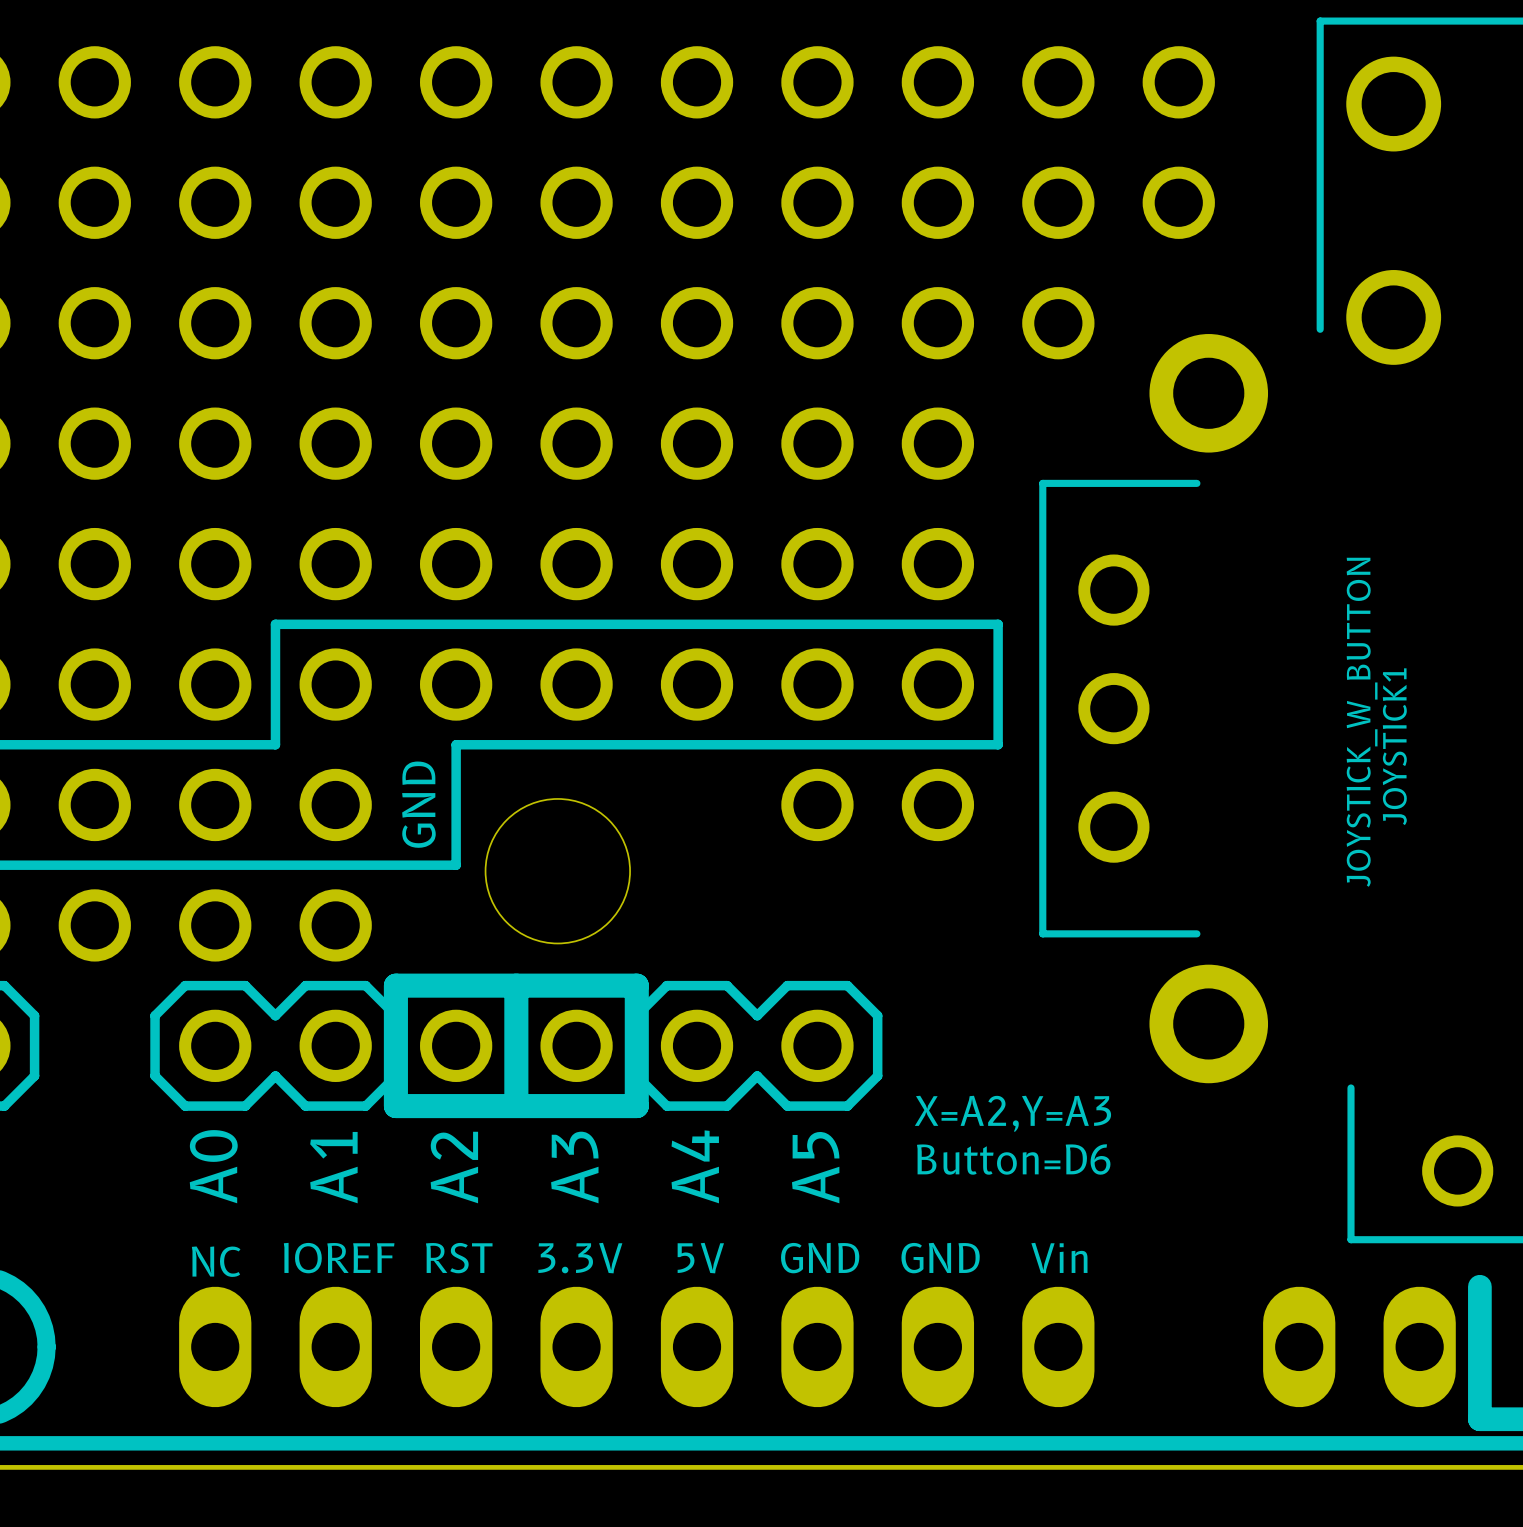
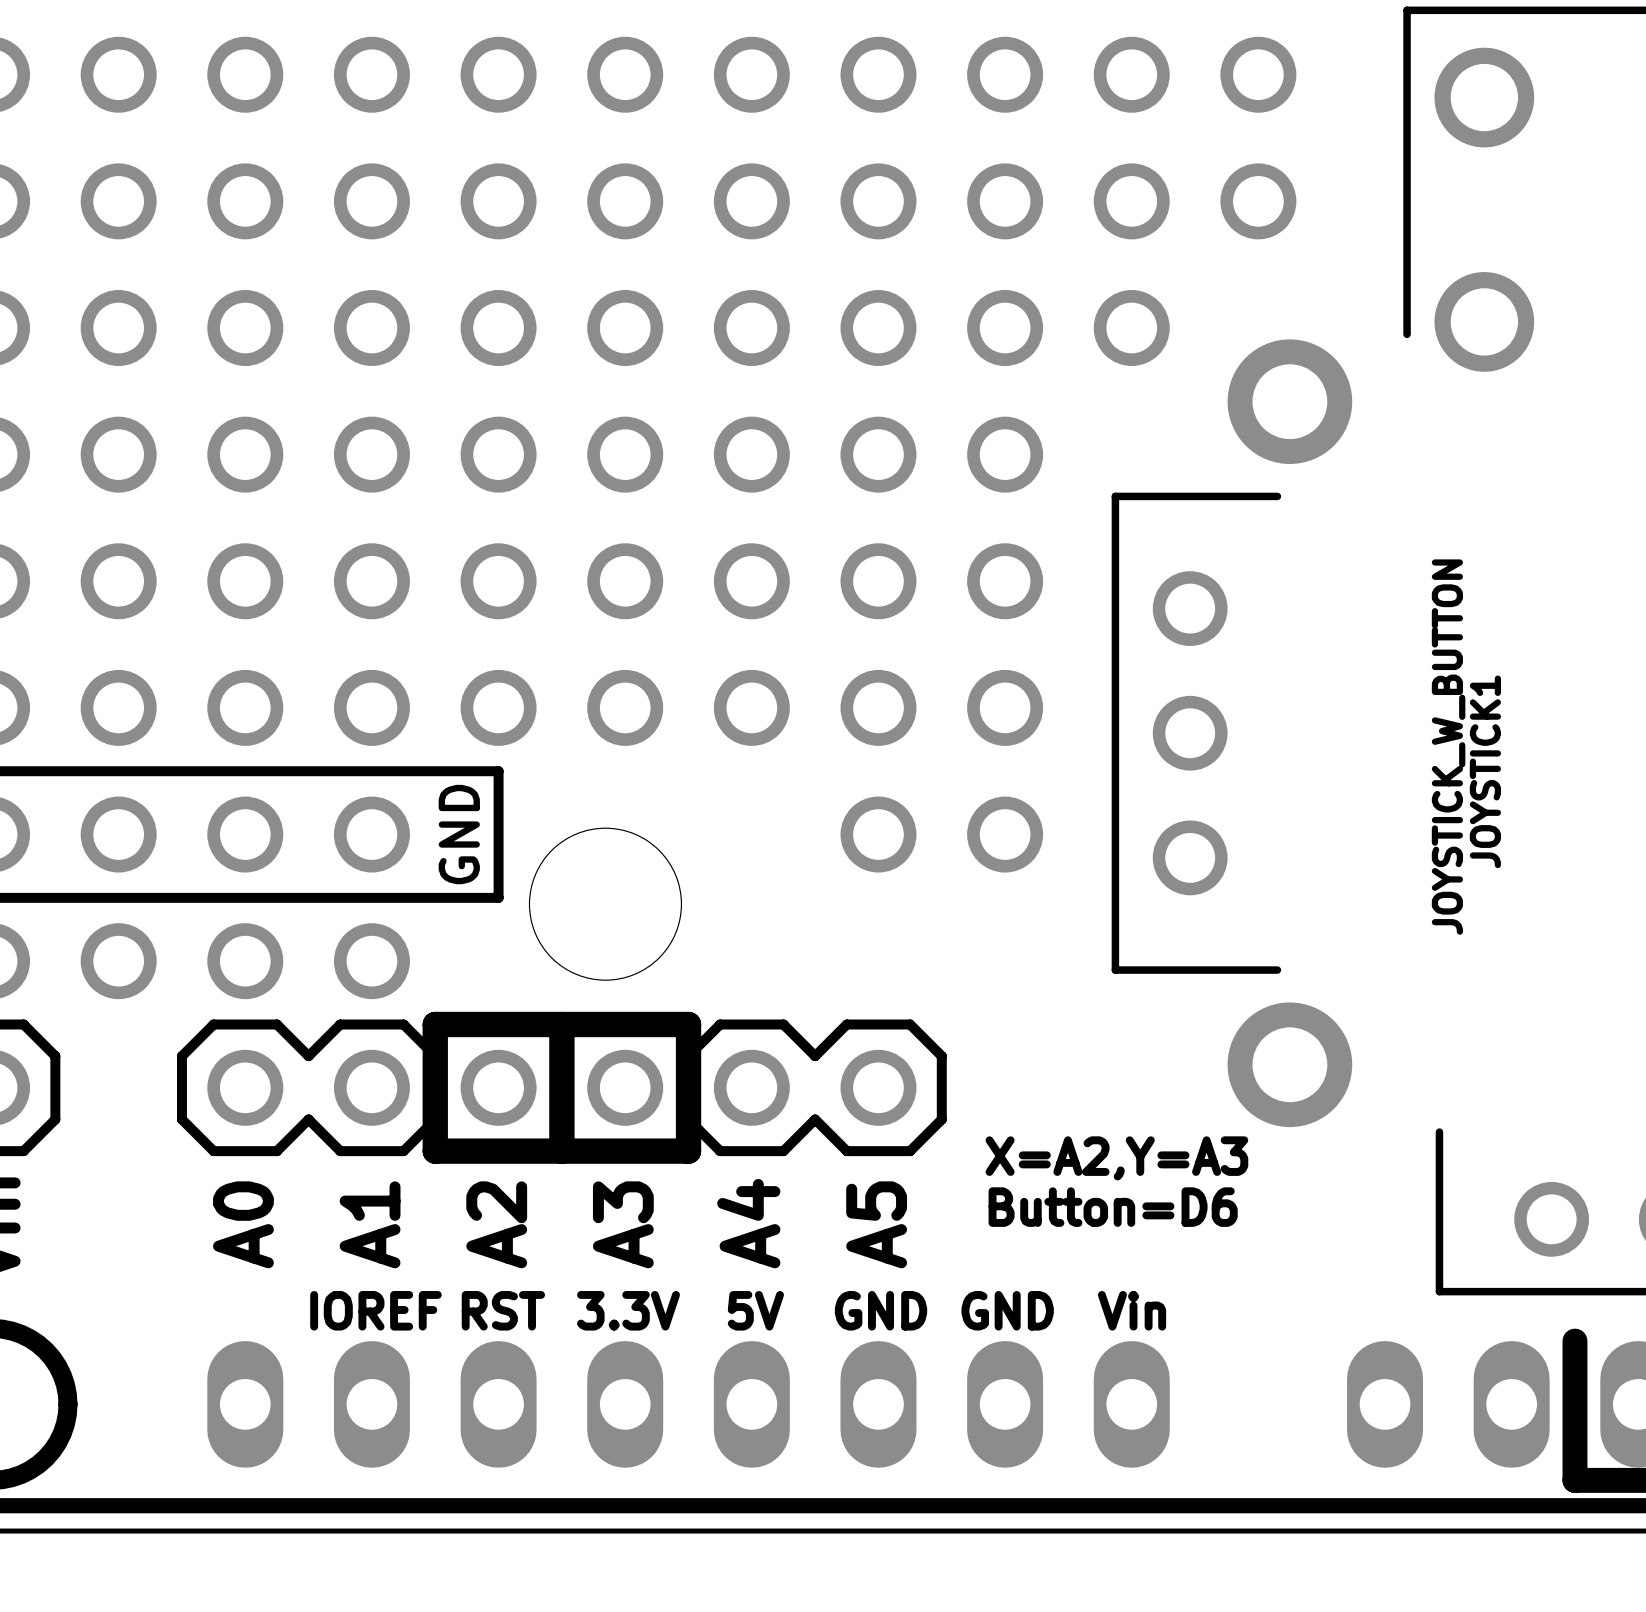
line: (275, 744) (275, 624) (998, 624) (998, 744) (456, 744) -> (308, 771) (498, 771)
text: NC (216, 1261) -> none

